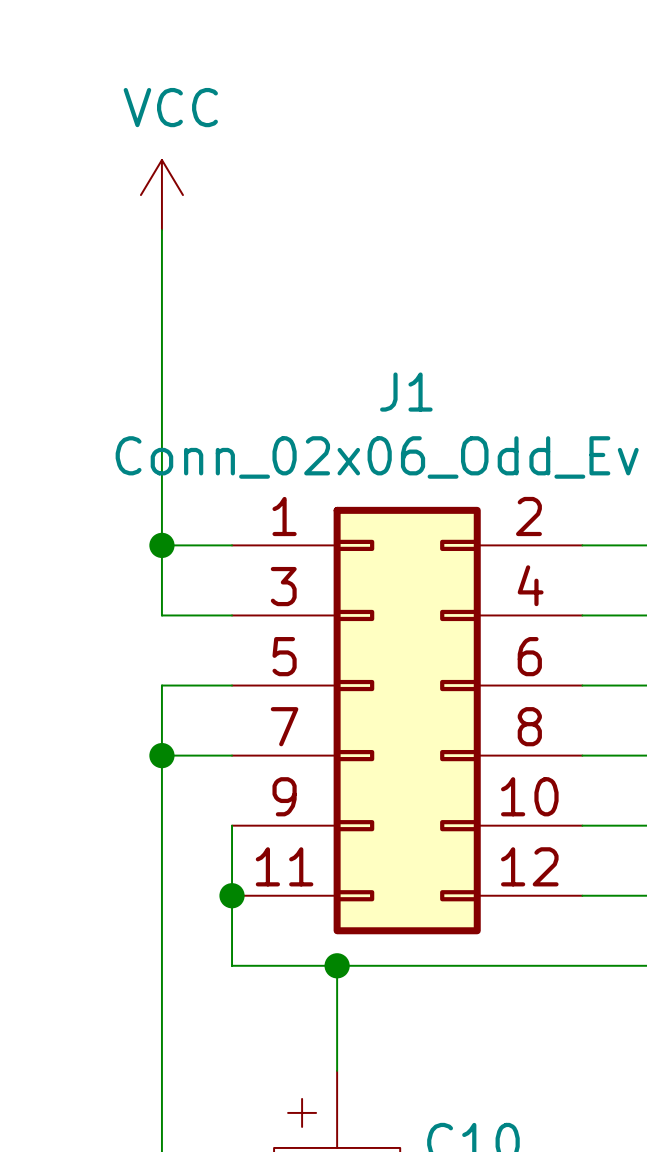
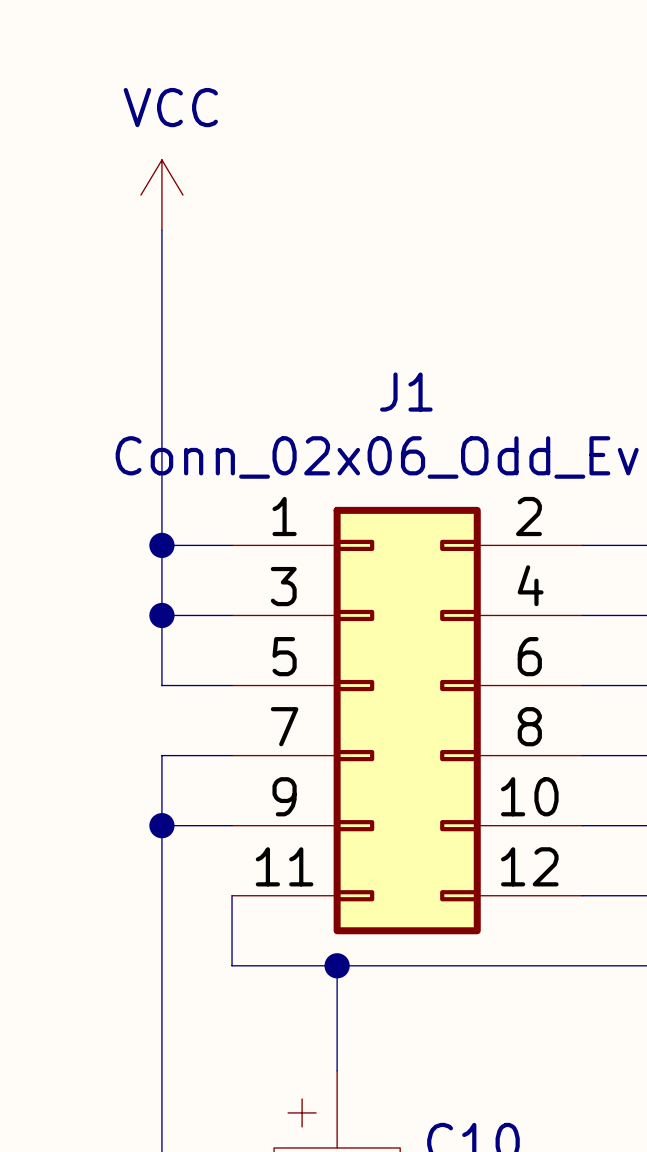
junction: none -> (161, 615)
wire: (161, 685) (161, 755) -> (161, 685) (161, 615)
junction: (161, 755) -> none
junction: none -> (161, 825)
wire: (232, 825) (232, 895) -> (232, 825) (161, 825)
junction: (232, 895) -> none

